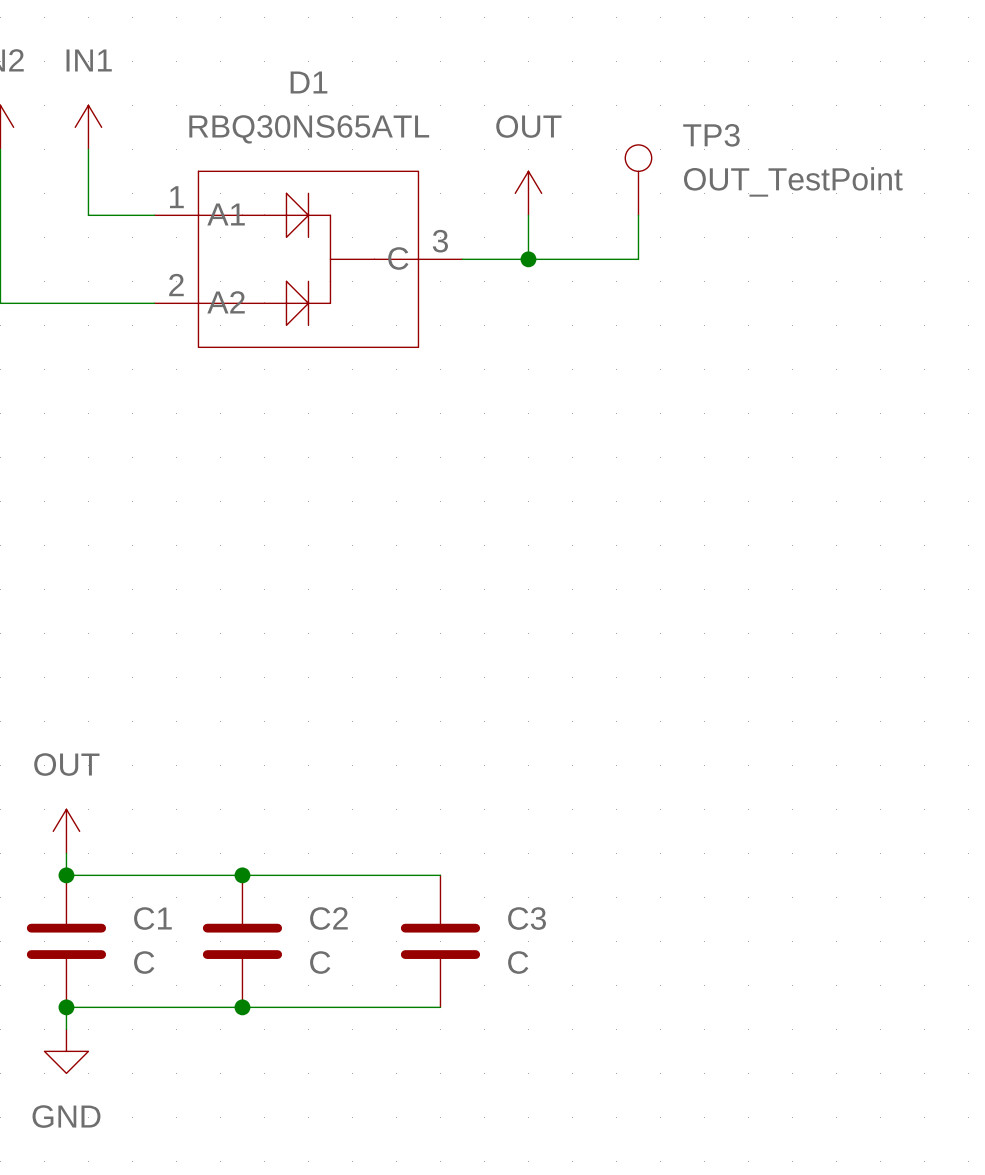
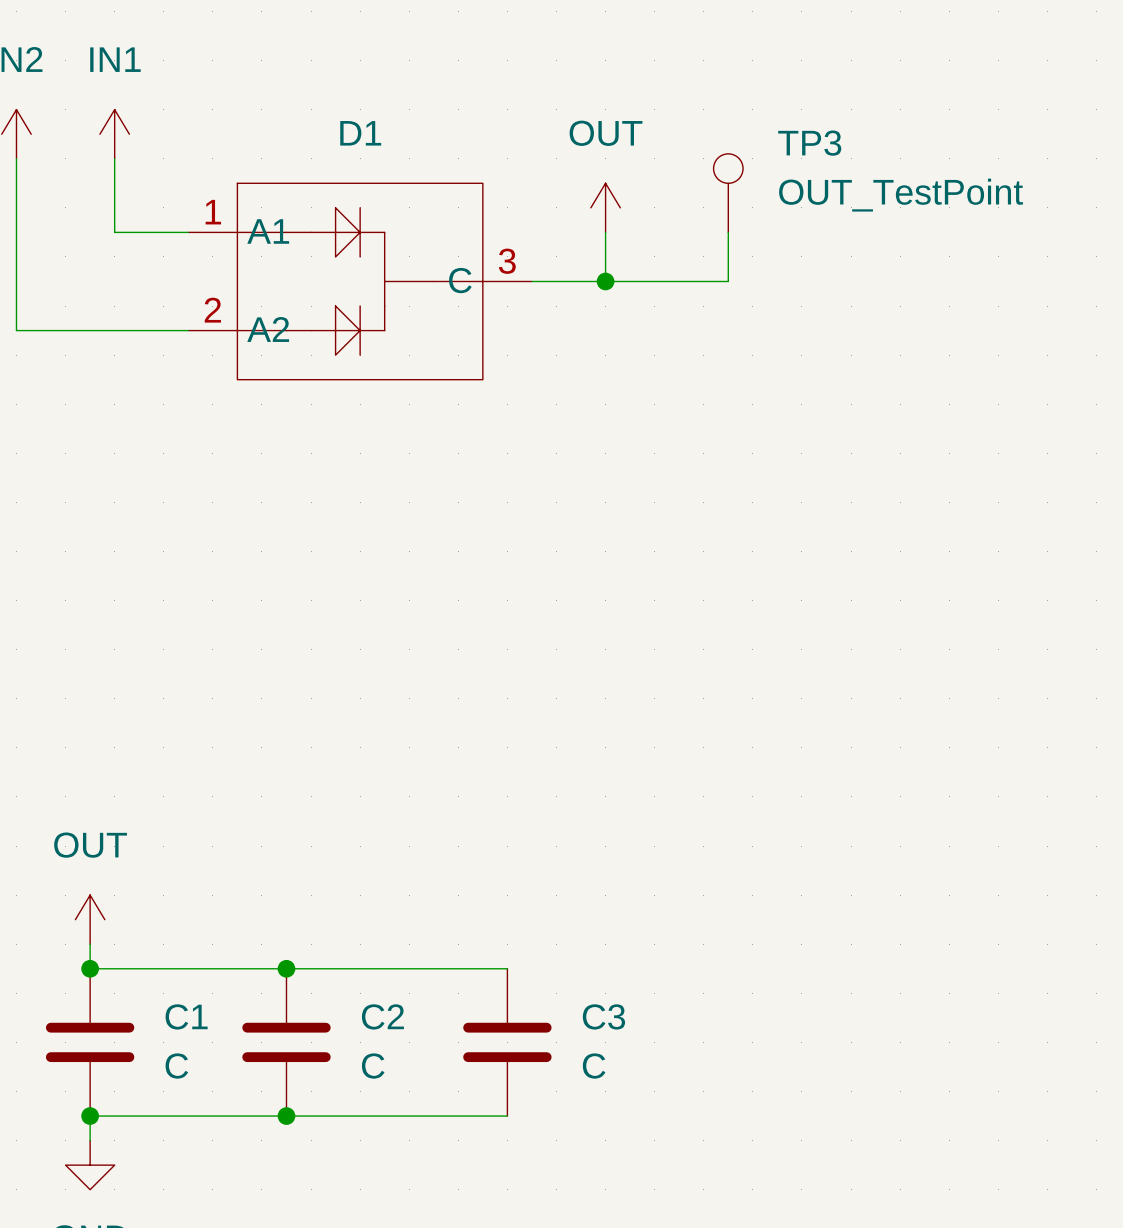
D1 name position: D1 (308, 82) -> D1 (360, 133)
D1 value: RBQ30NS65ATL (309, 129) -> none

